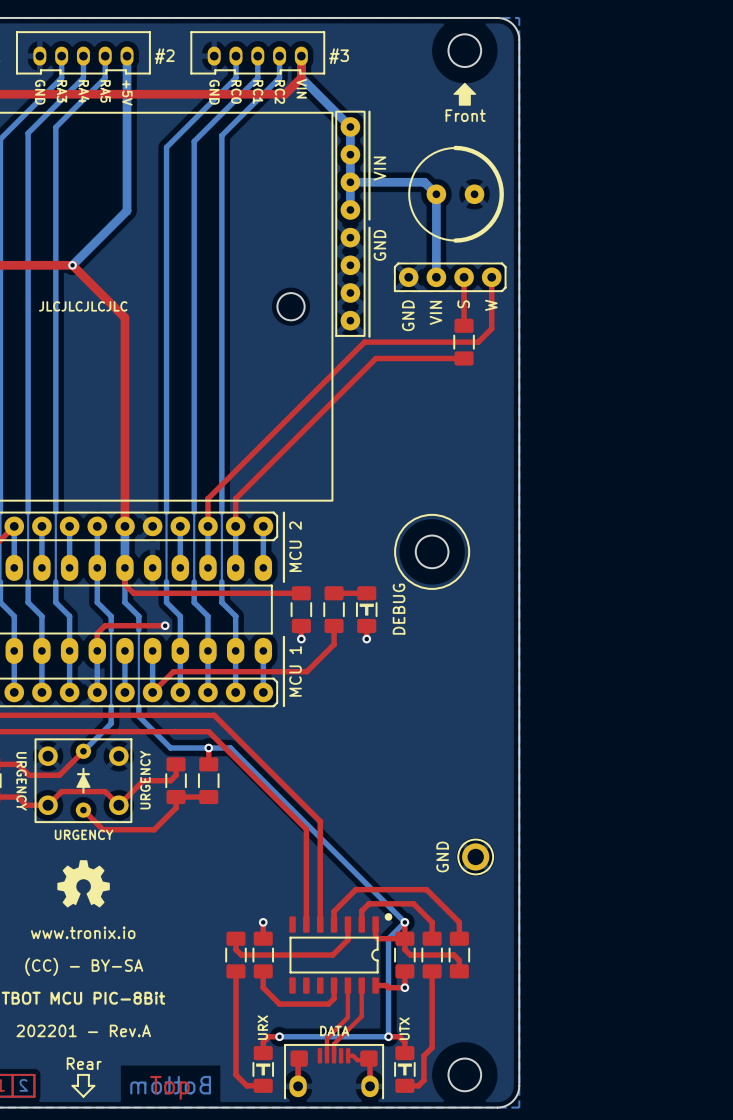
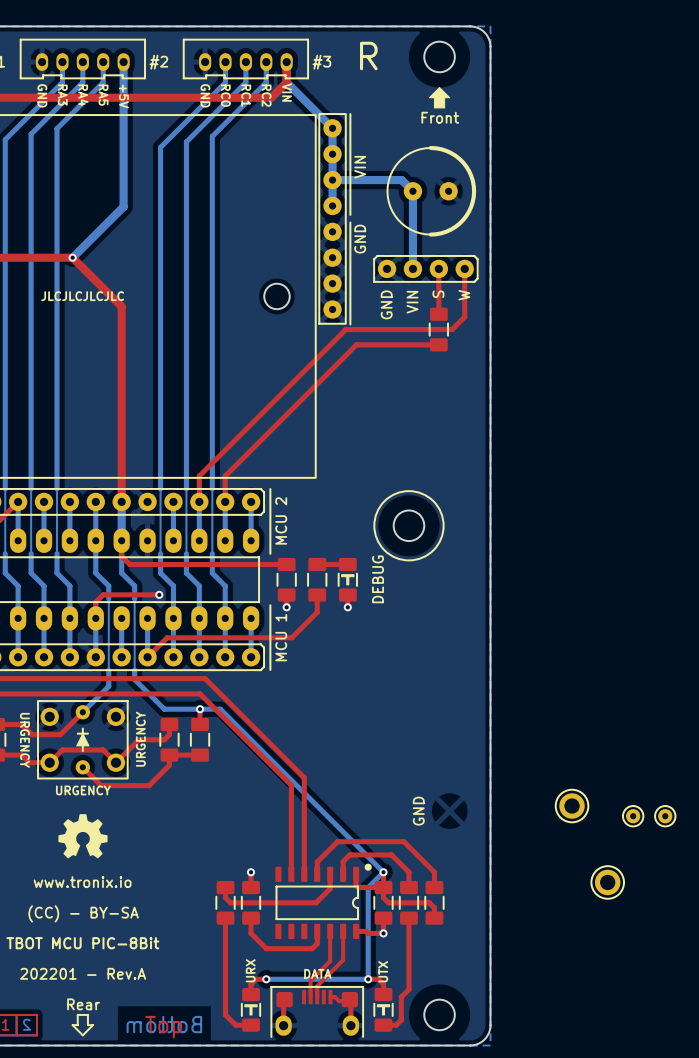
text: none -> R (368, 56)
part: none -> (572, 806)
part: (475, 856) -> none
part: none -> (633, 816)
part: none -> (665, 816)
part: none -> (607, 882)

